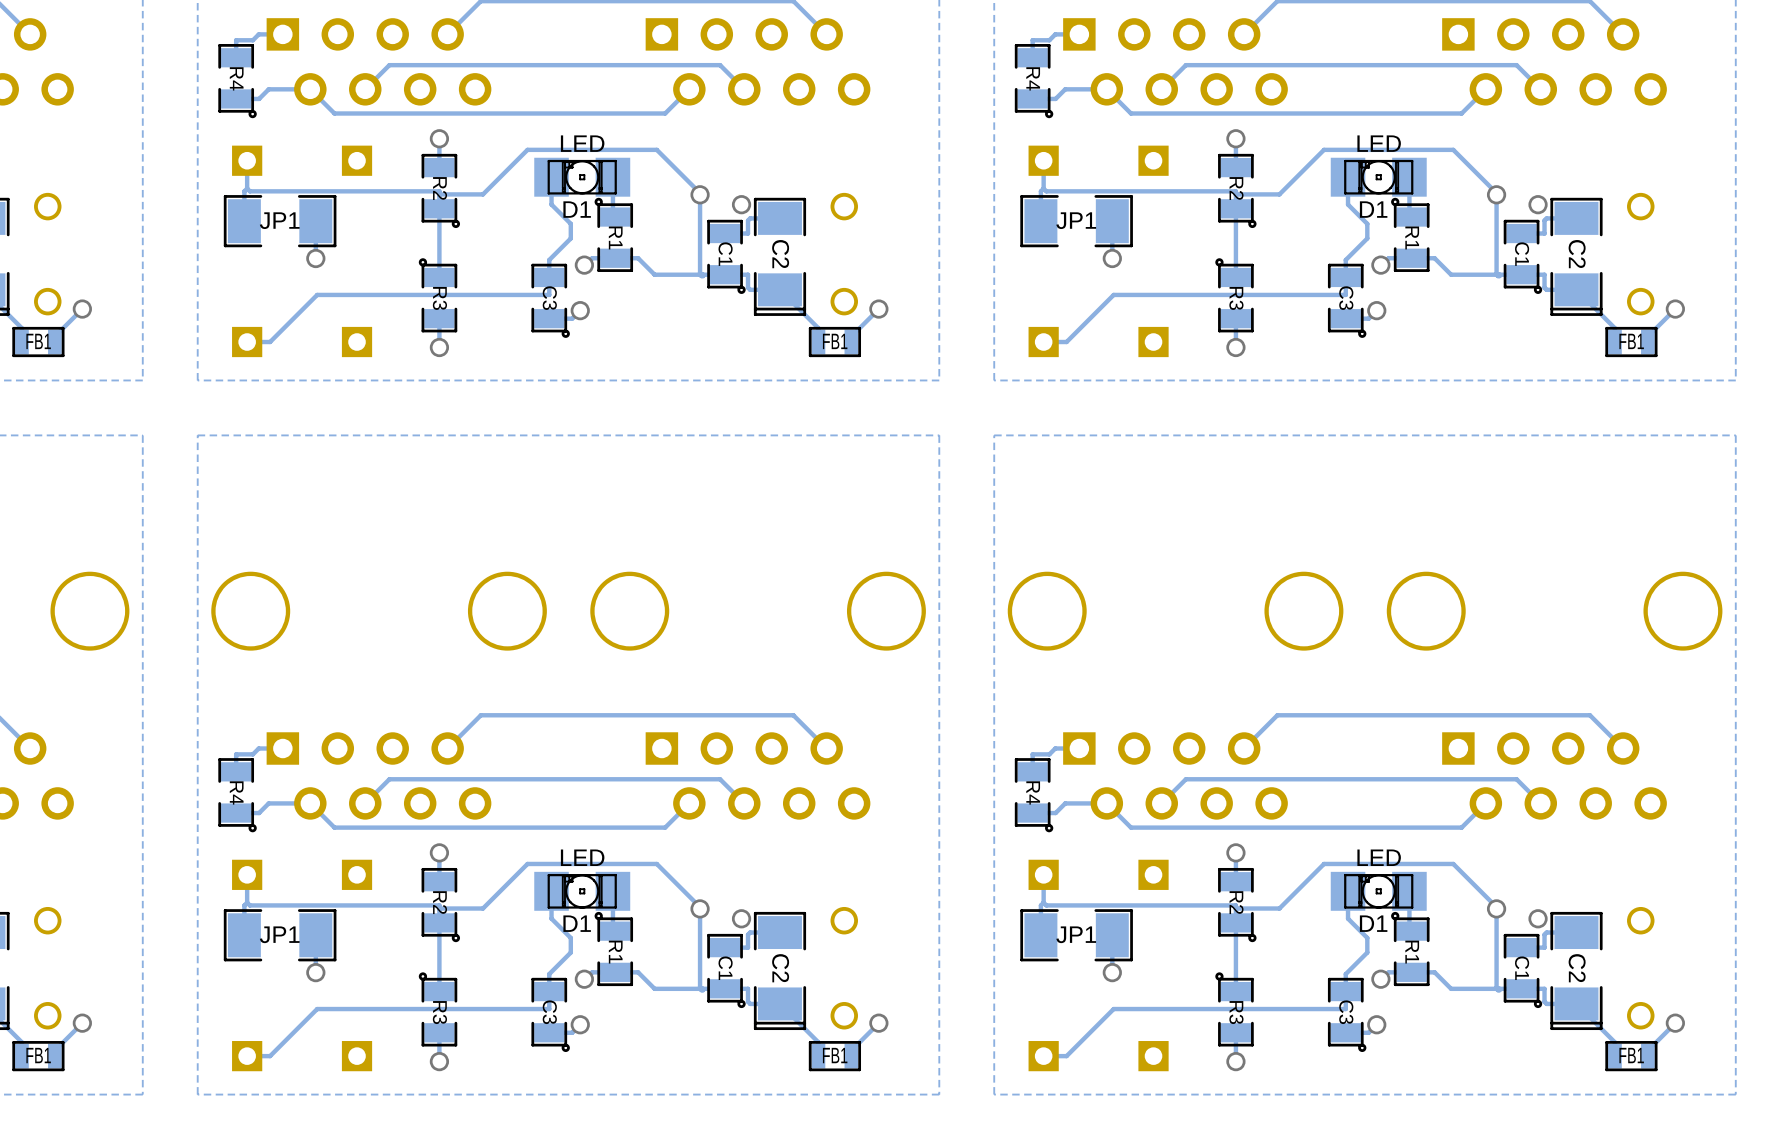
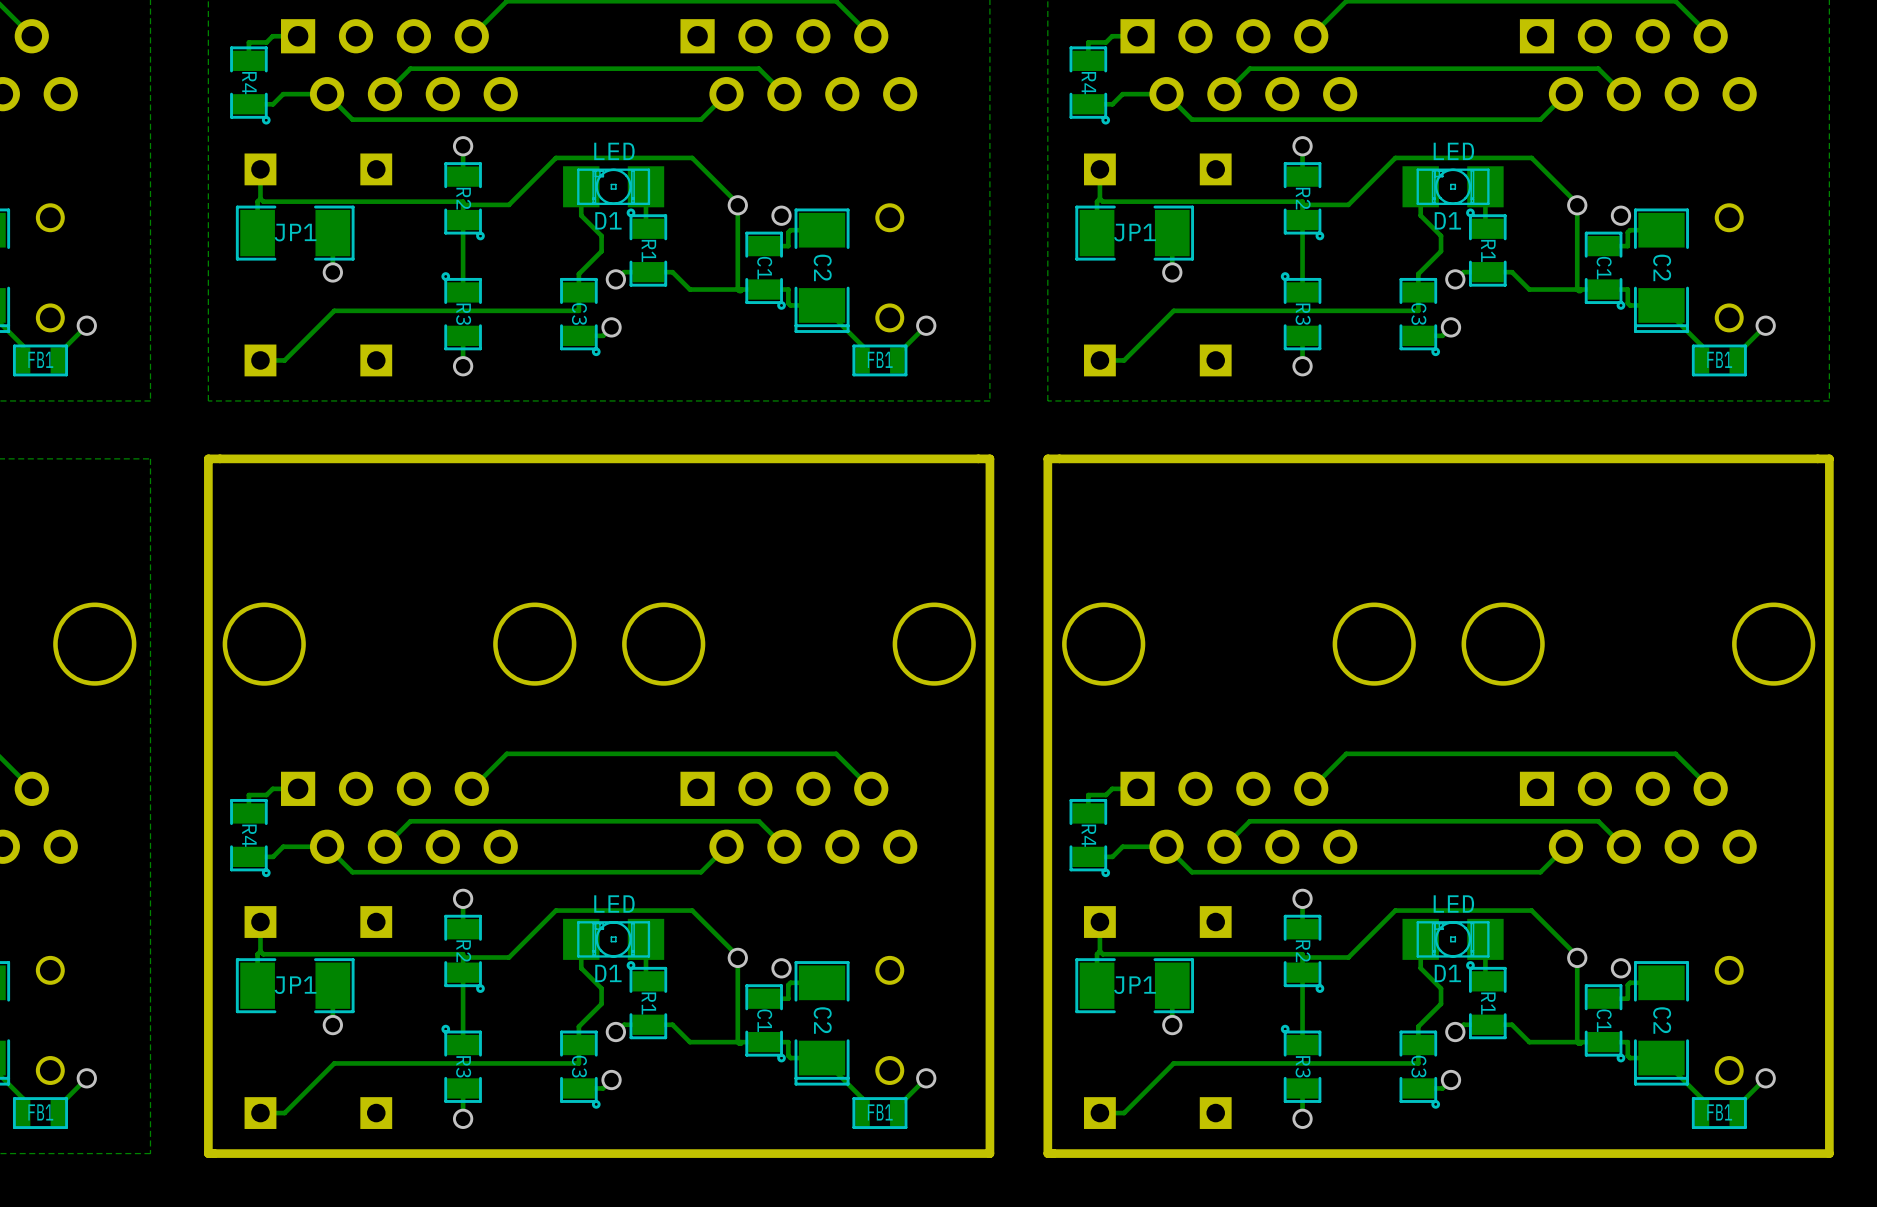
board edge: none -> (989, 458) (989, 1153) (208, 1153) (208, 458) (989, 458)
board edge: none -> (1829, 458) (1829, 1153) (1047, 1153) (1047, 458) (1829, 458)

